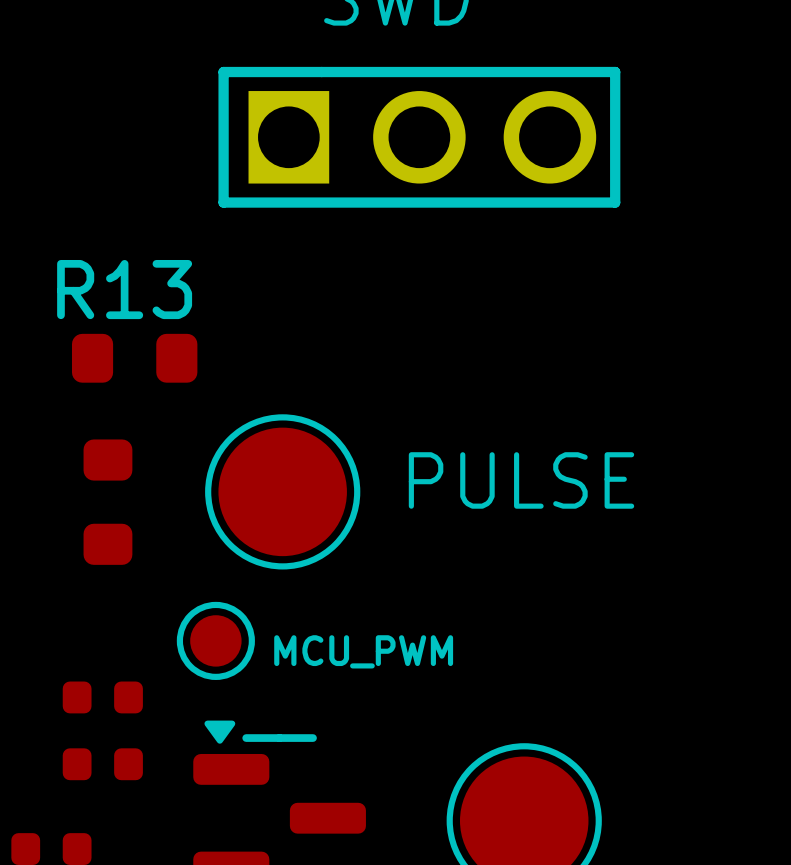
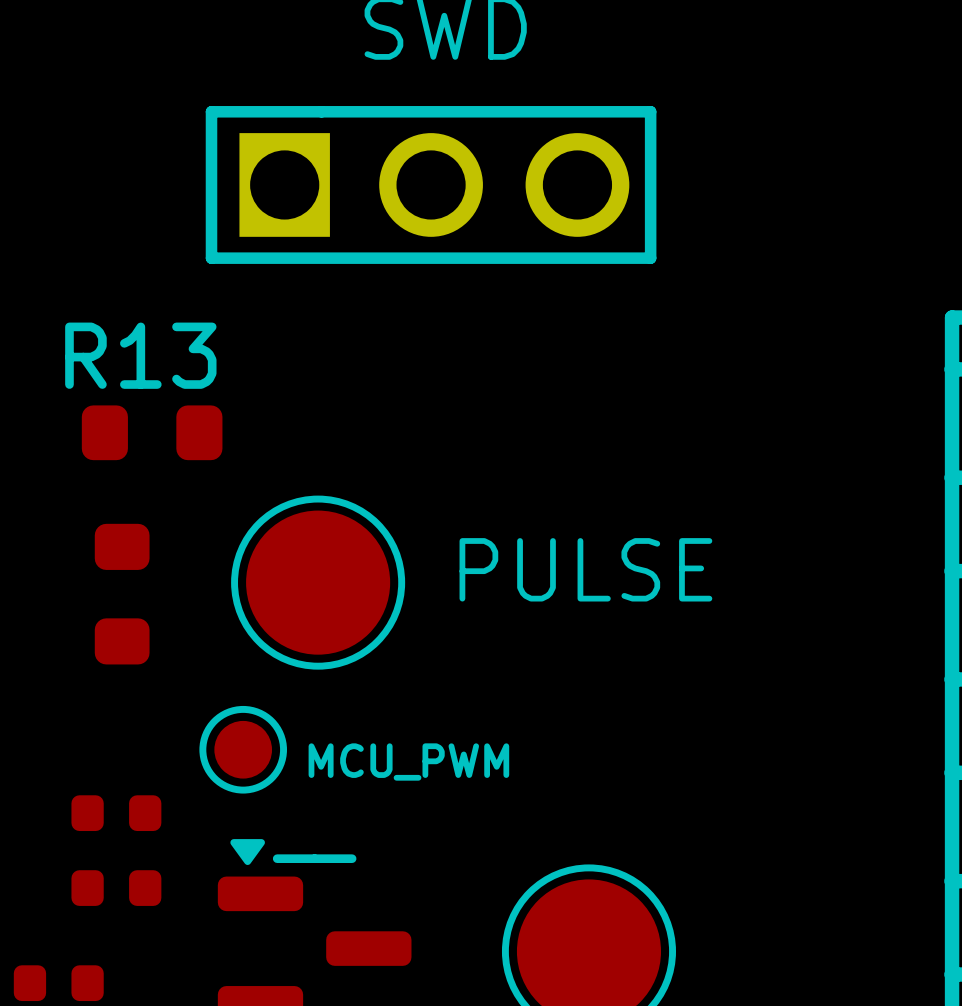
part position: (419, 137) -> (431, 184)

